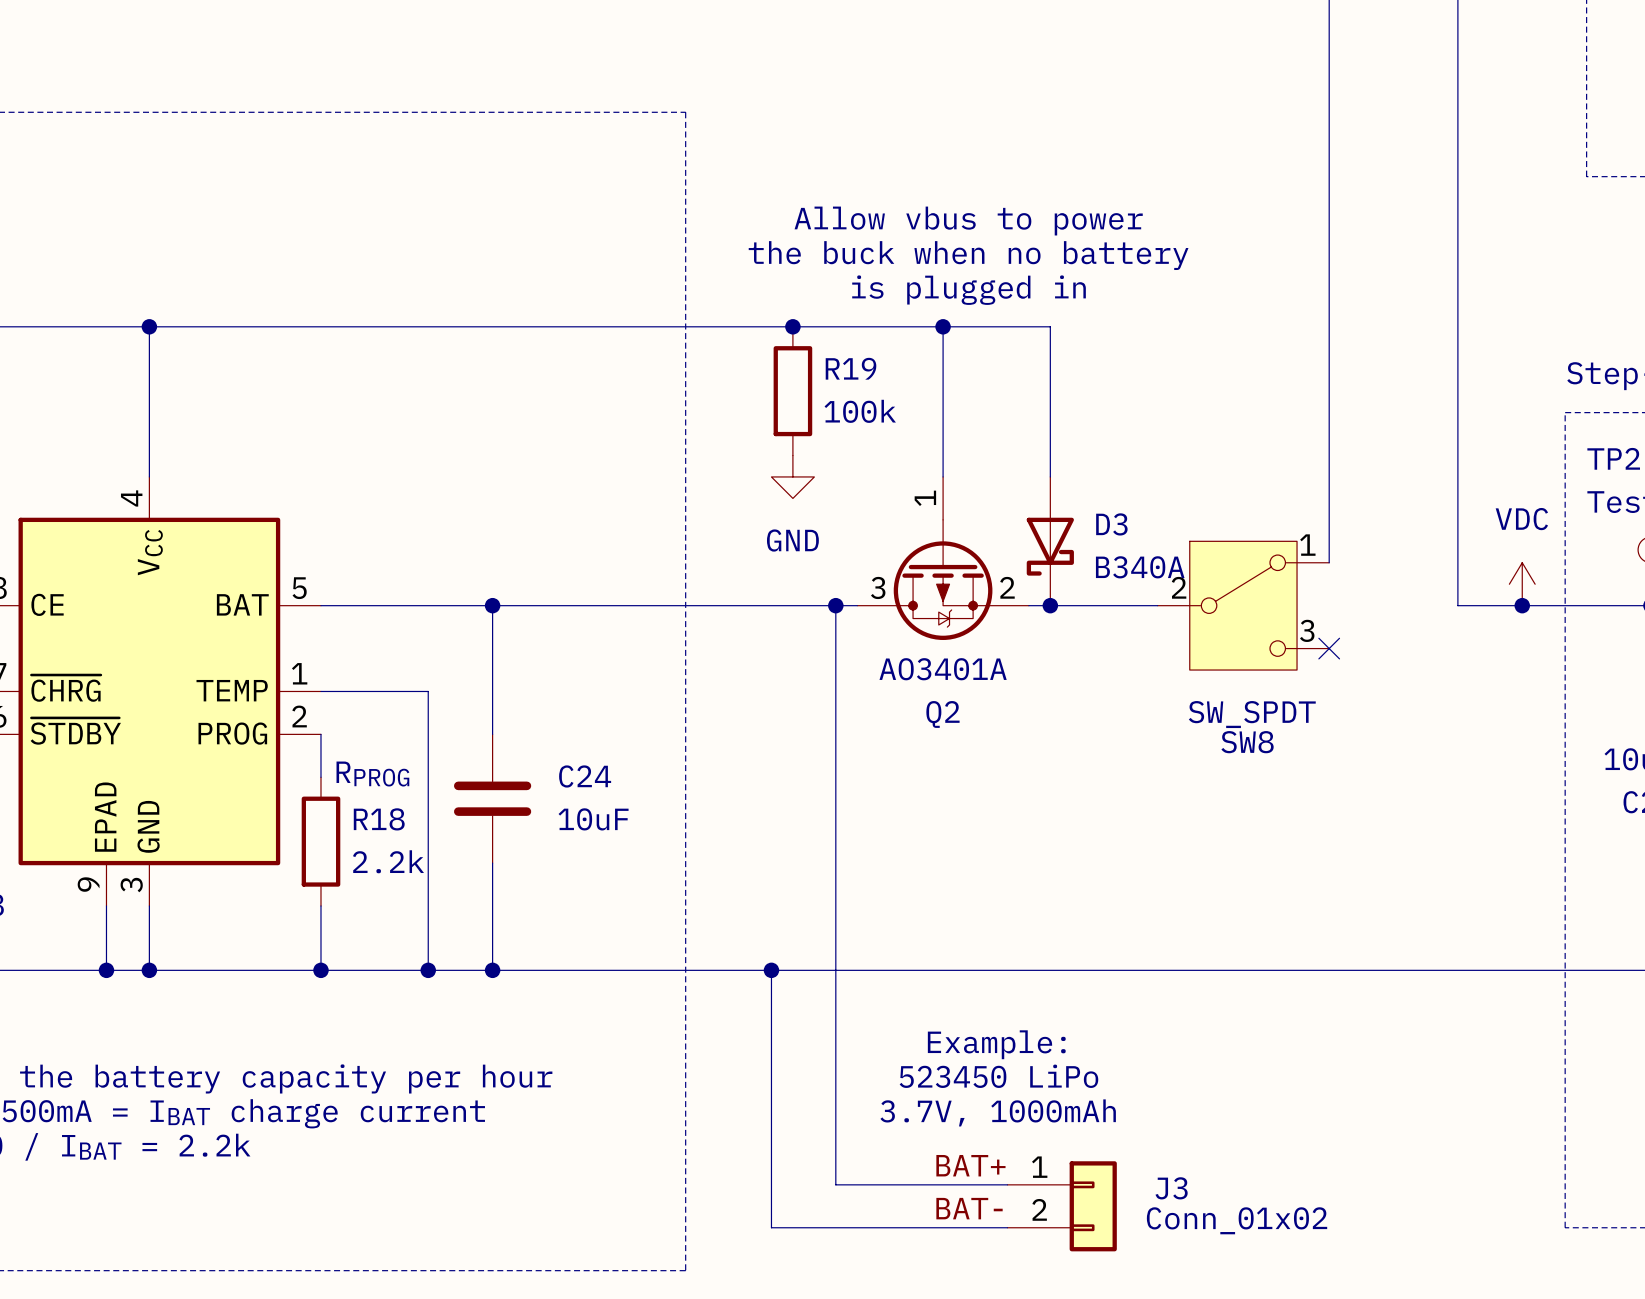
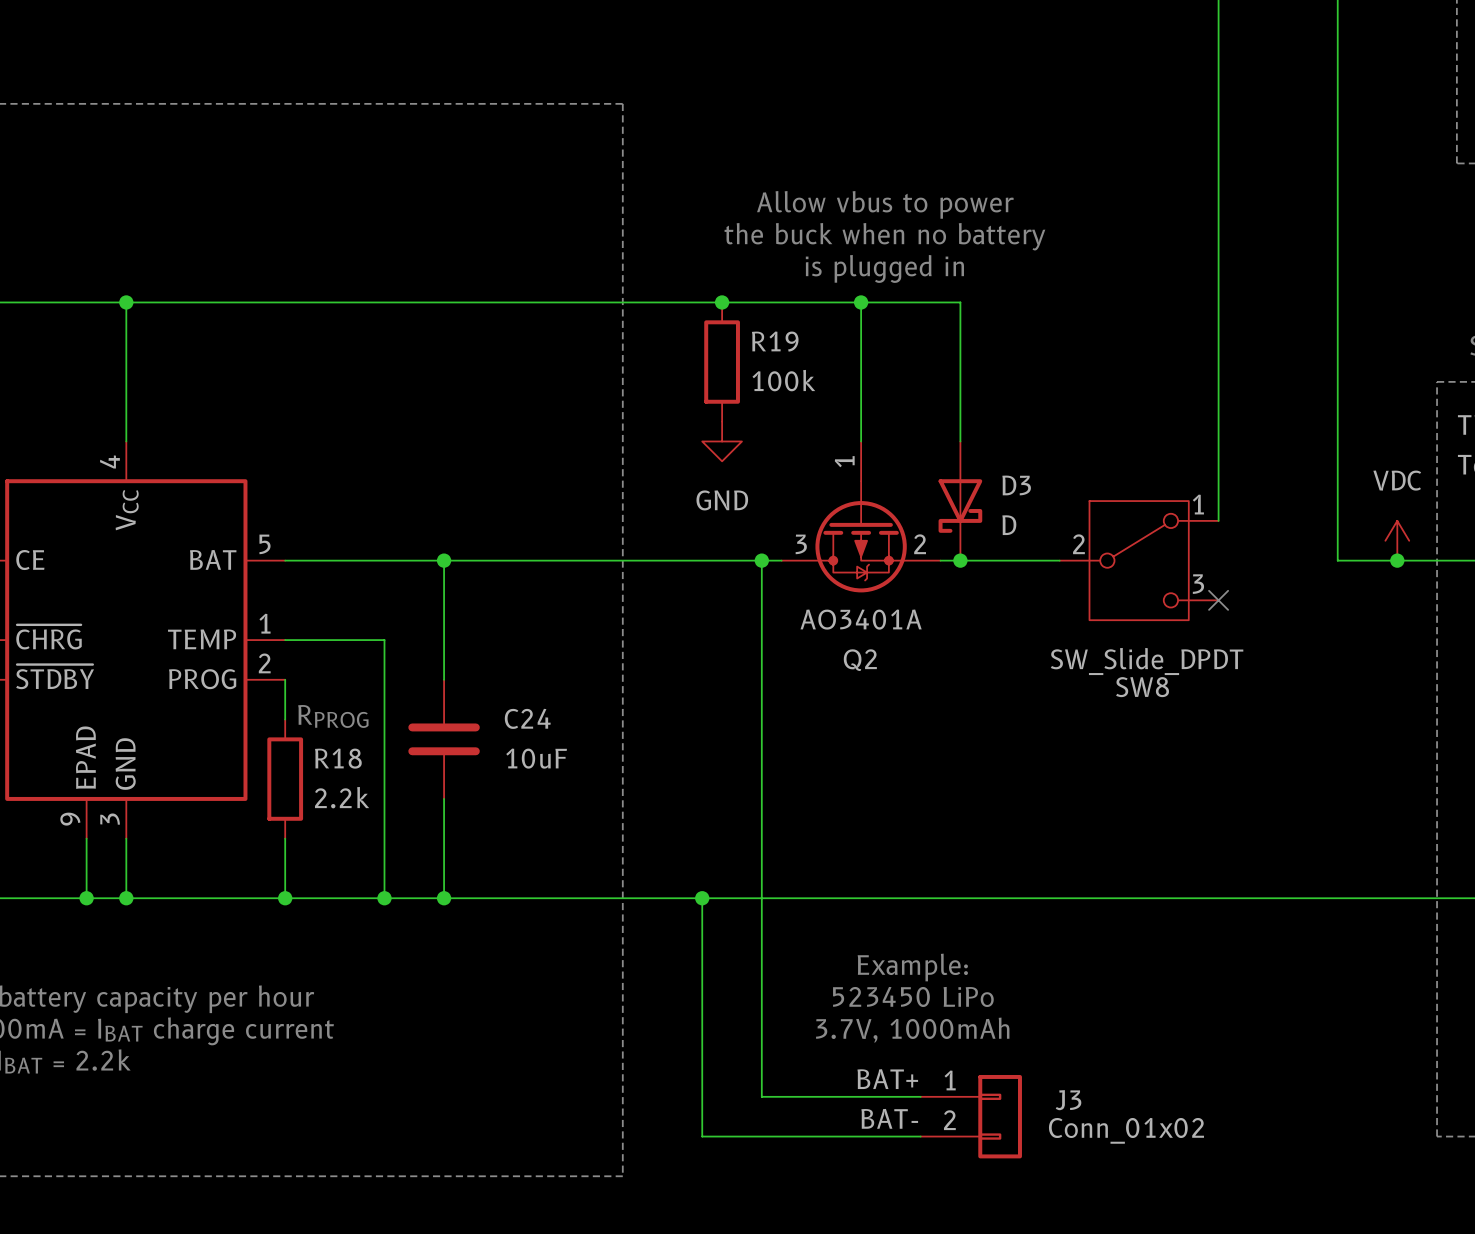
D3 value: B340A (1140, 567) -> D (1009, 525)
SW8 value: SW_SPDT (1252, 714) -> SW_Slide_DPDT (1147, 661)

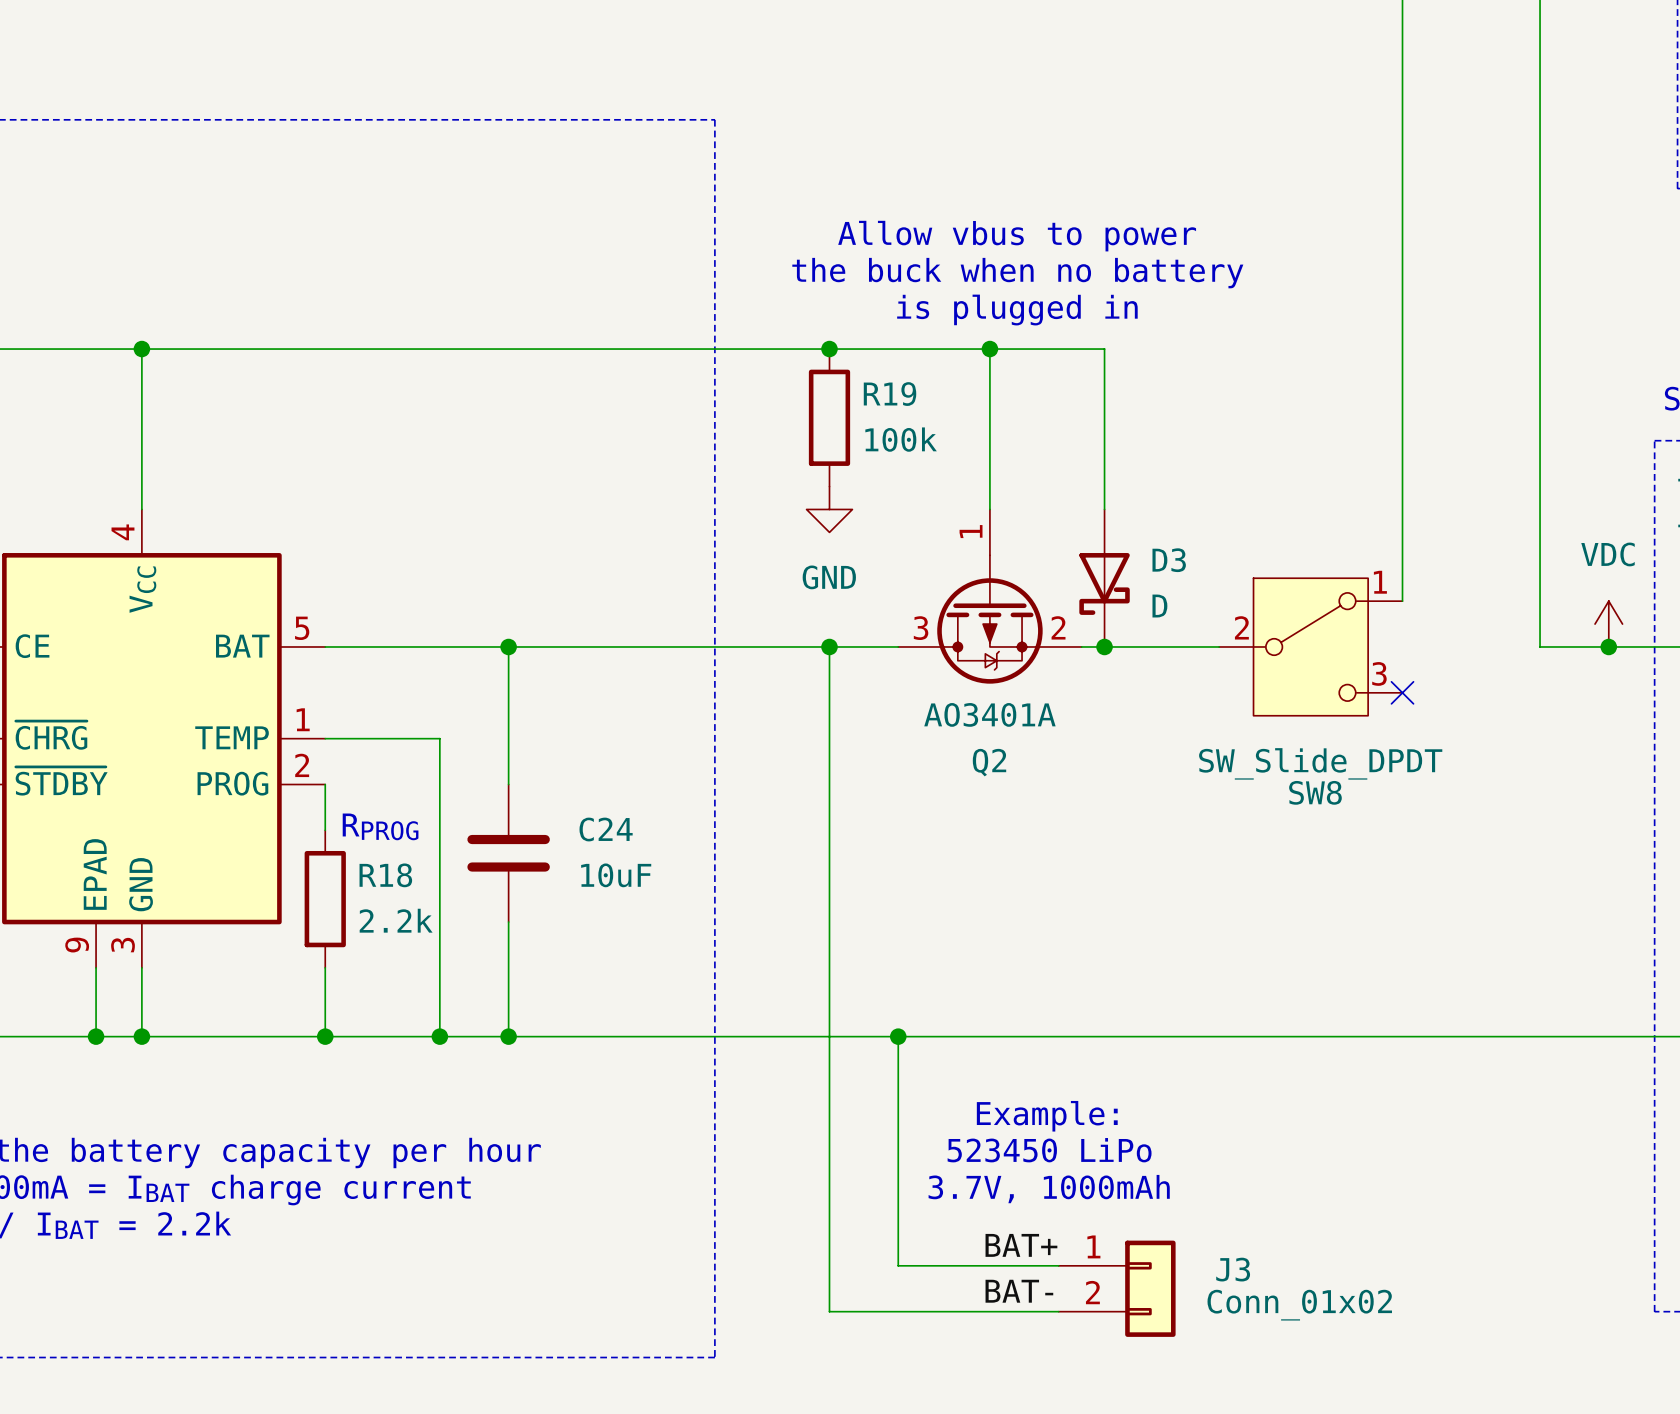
wire: (761, 560) (761, 1096) (781, 1096) -> (898, 1036) (898, 1265)
junction position: (761, 560) -> (829, 646)
wire: (702, 898) (702, 1136) (722, 1136) -> (829, 646) (829, 1311)
junction position: (702, 898) -> (898, 1036)

